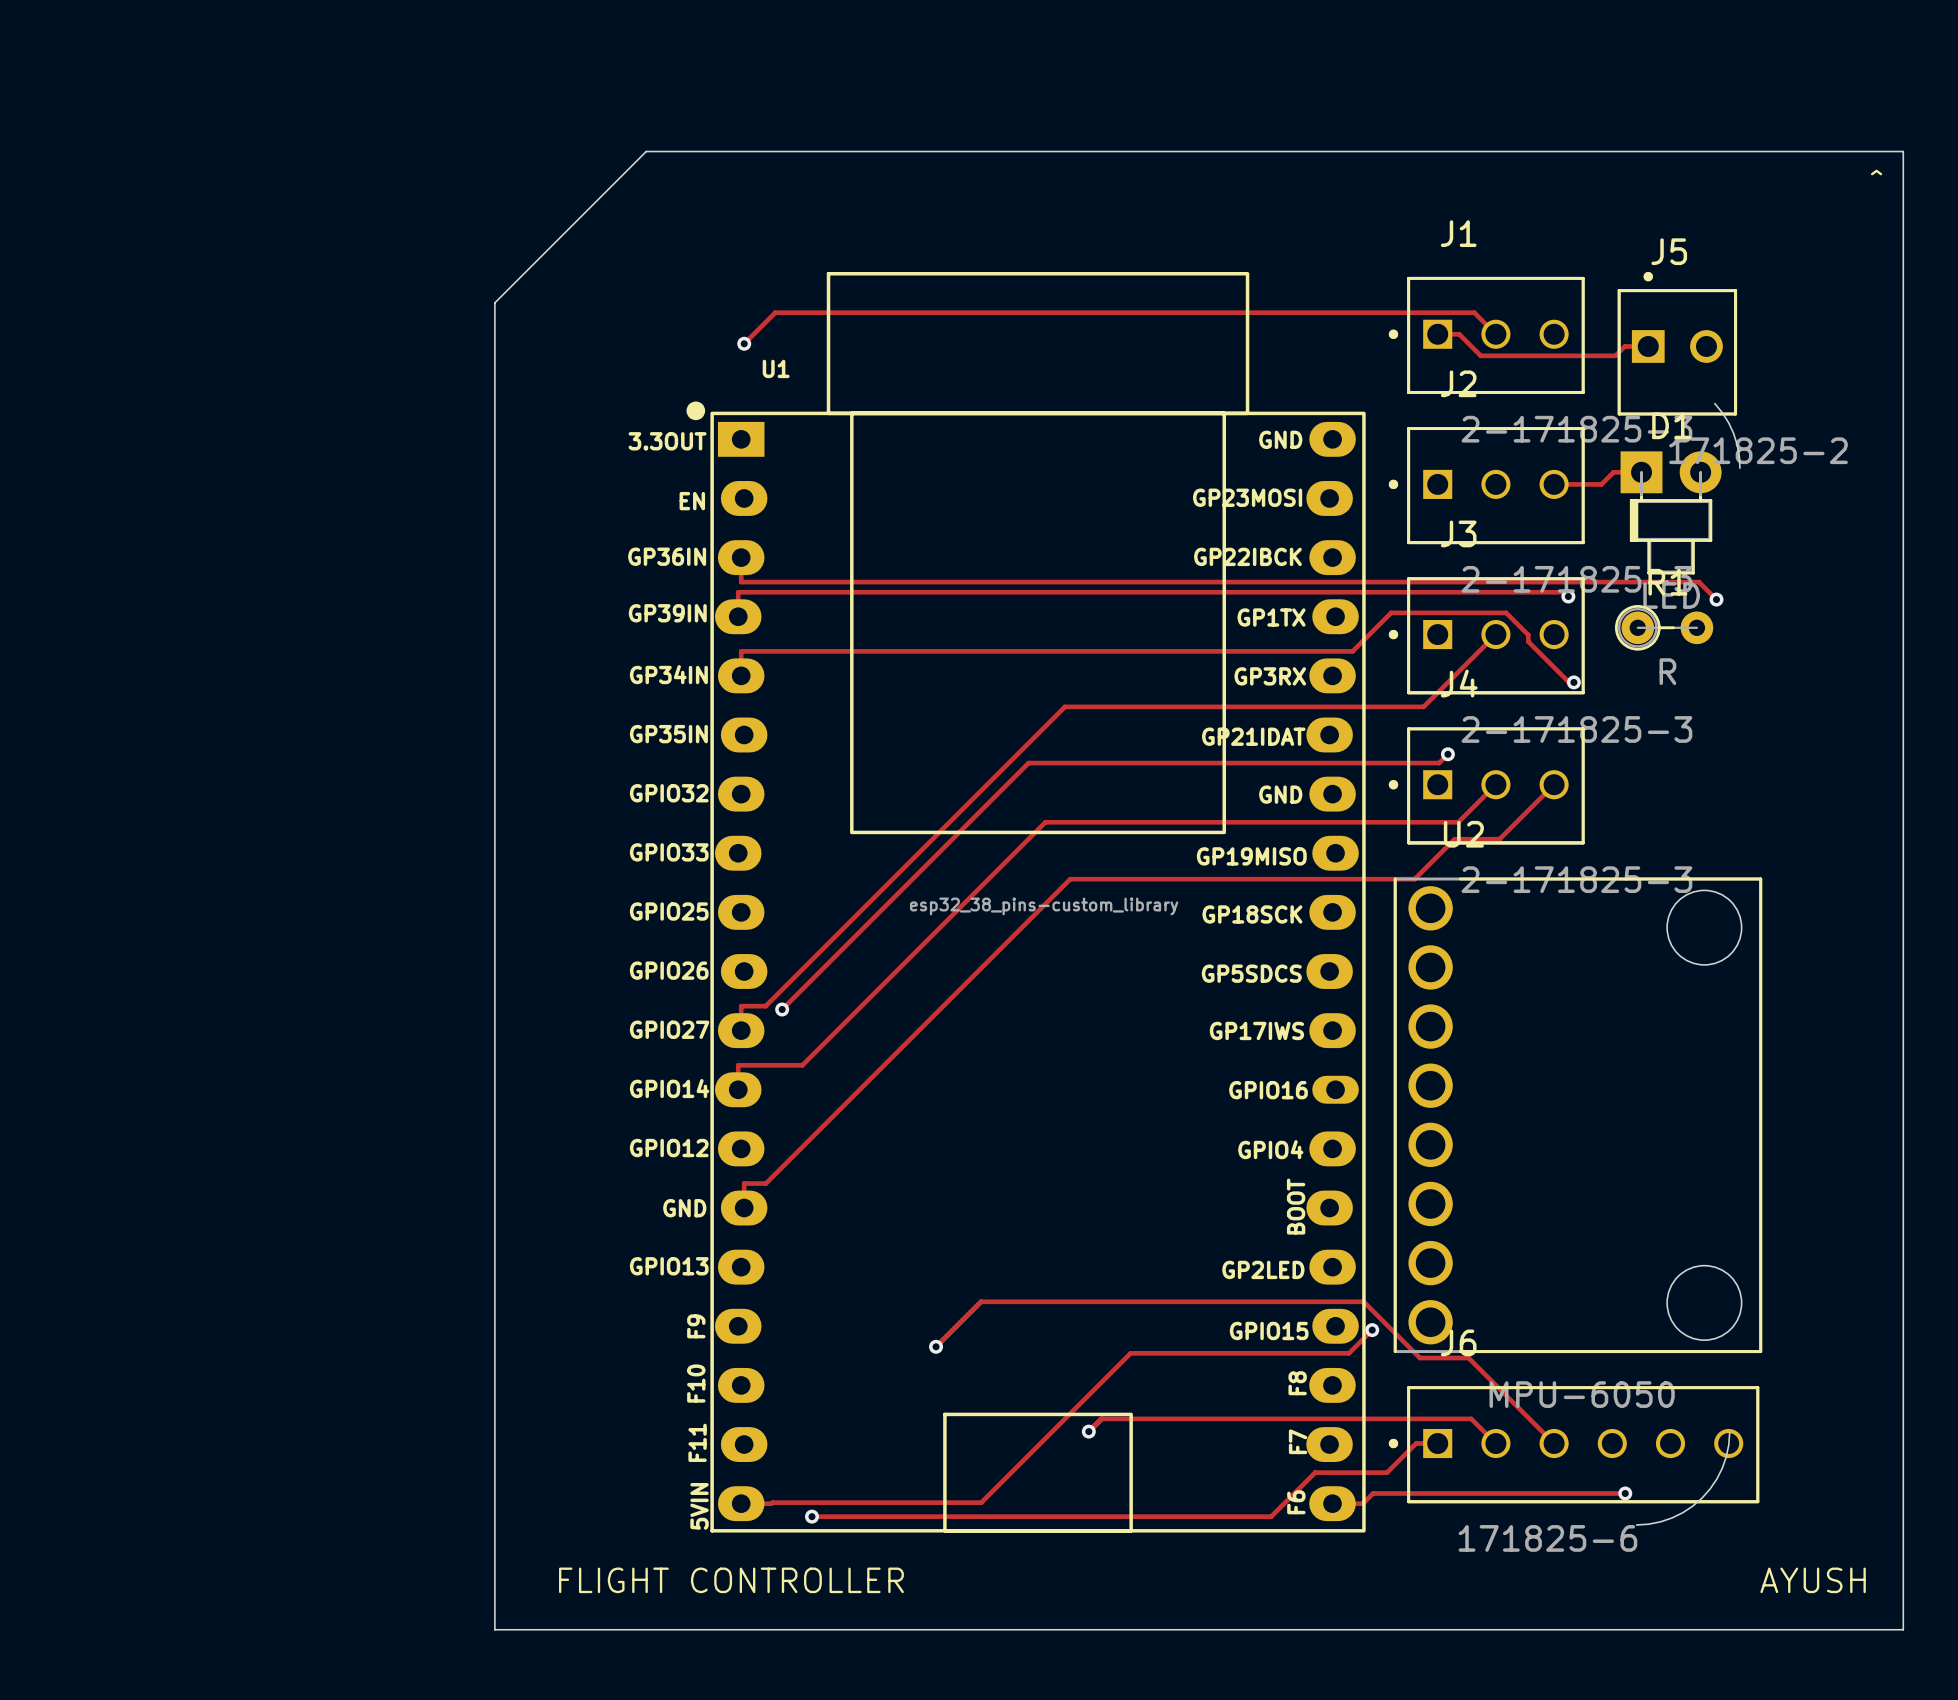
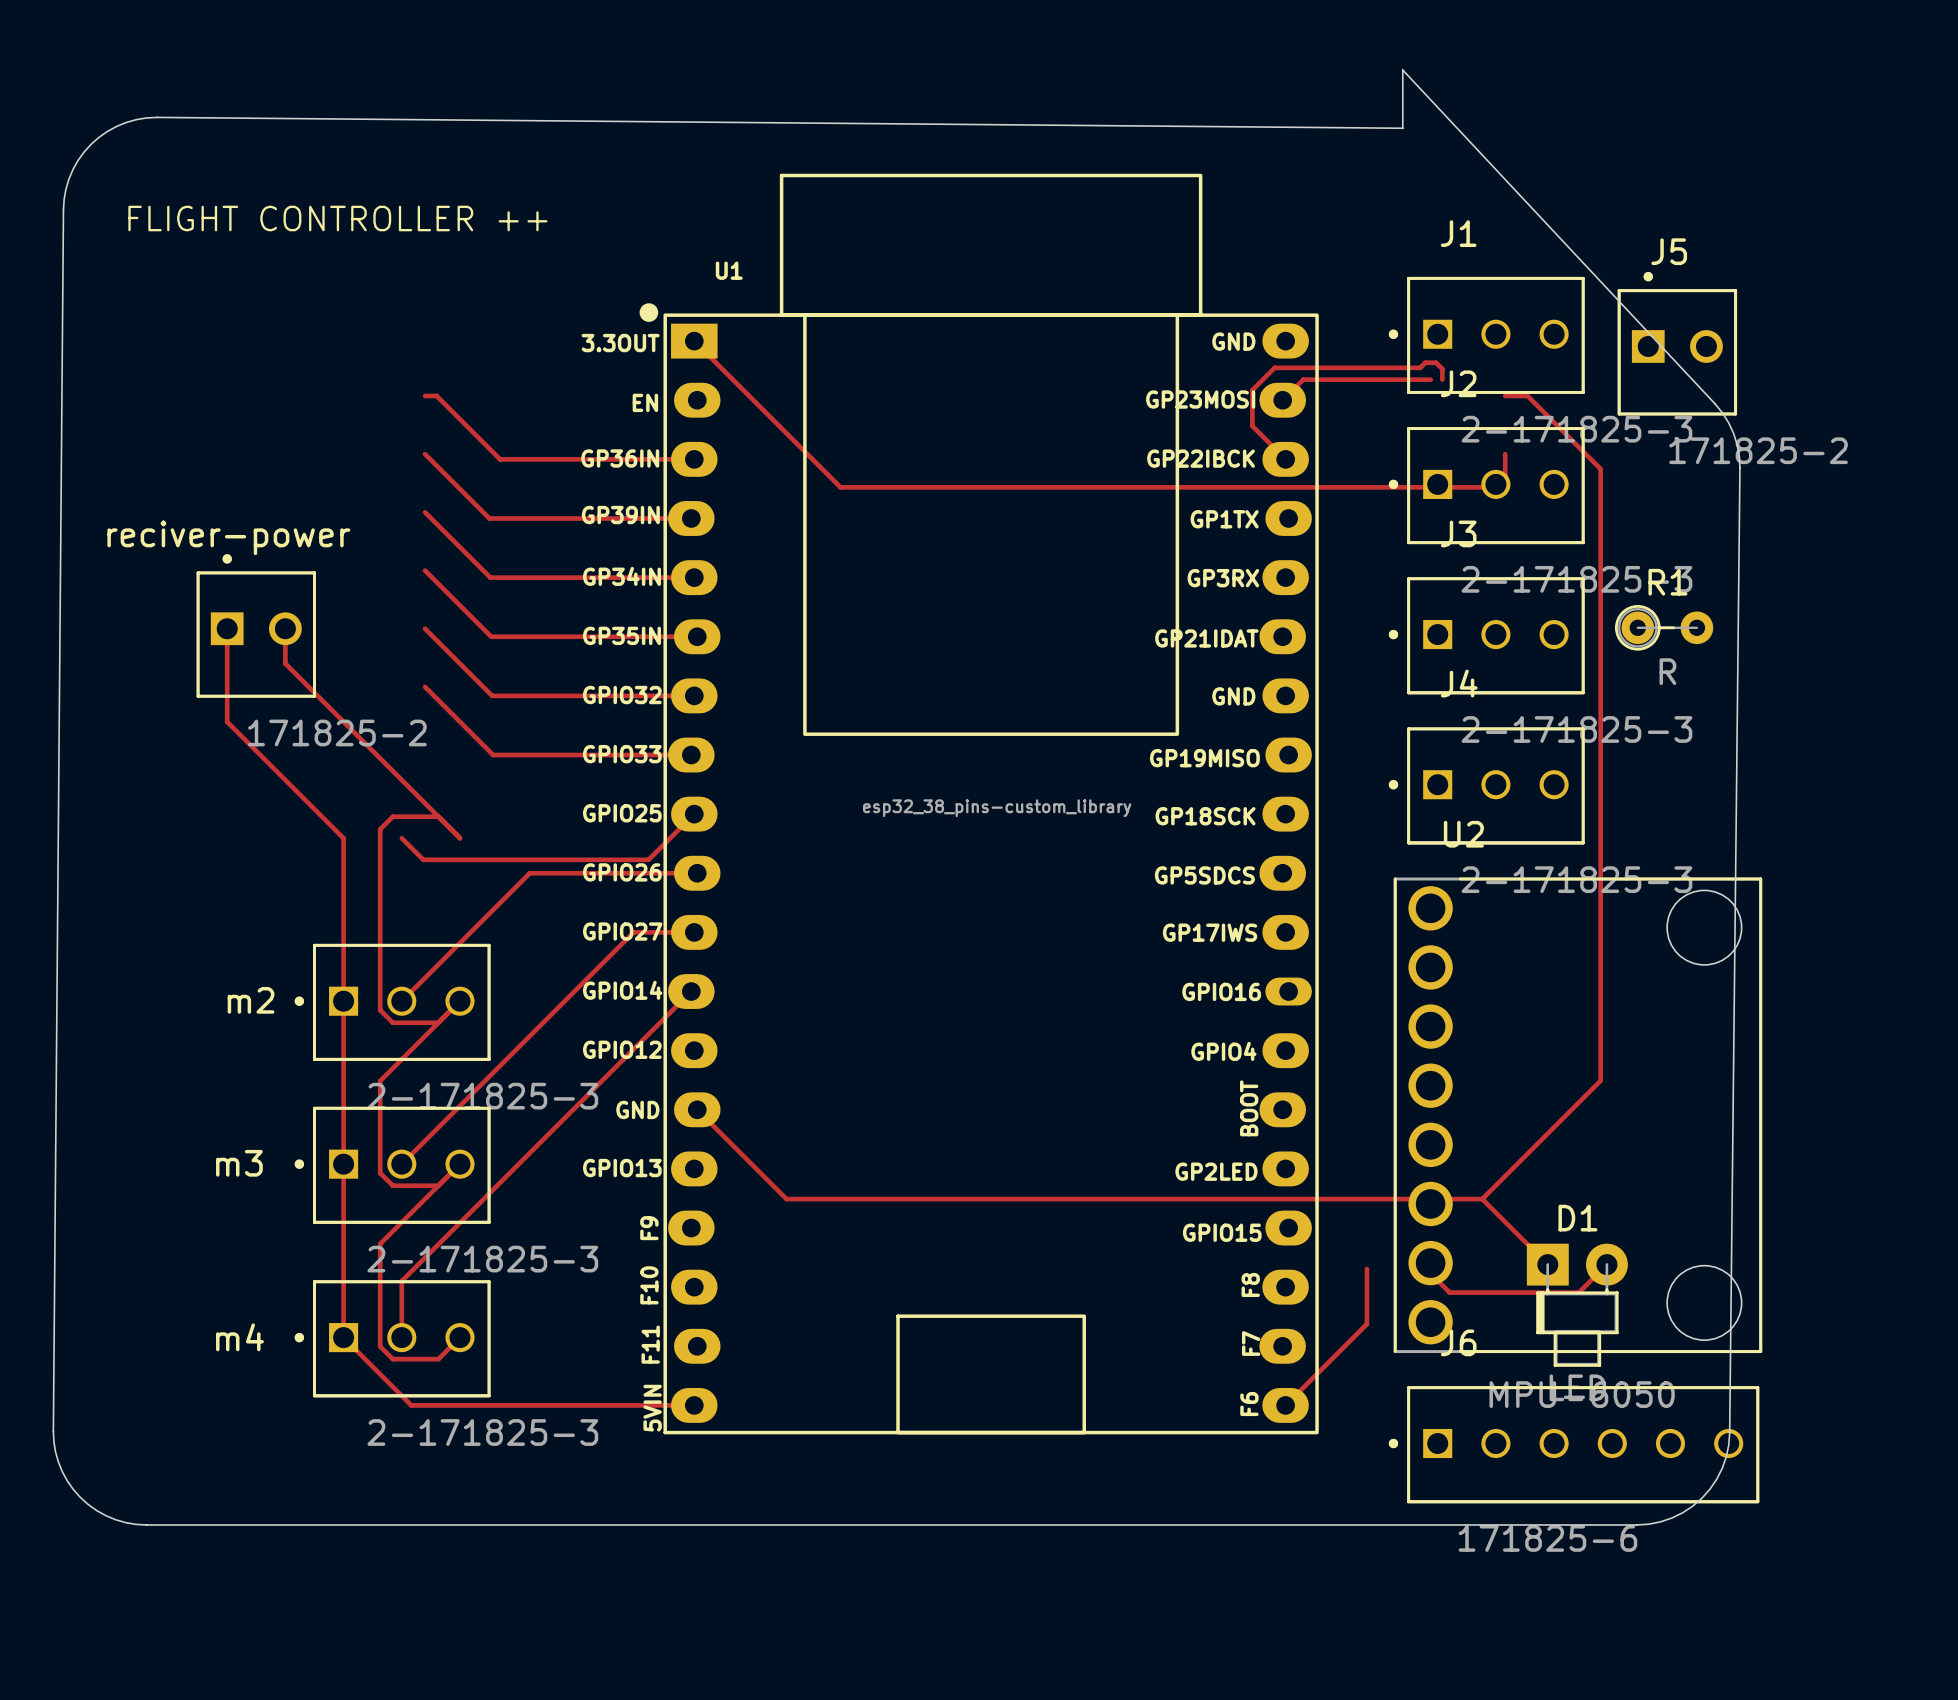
board edge: (646, 151) (494, 302) (494, 1629) (1903, 1629) (1903, 151) (646, 151) -> none
text: ^ (1876, 172) -> none
text: none -> FLIGHT CONTROLLER ++ (337, 218)
track: (1437, 334) (1459, 334) (1480, 355) (1615, 355) (1624, 346) (1648, 346) -> none
track: (1495, 334) (1474, 312) (775, 312) (744, 343) -> none
track: none -> (694, 341) (840, 487) (1494, 487) (1505, 476) (1505, 454)
via: (744, 343) -> none
track: none -> (1430, 379) (1303, 379) (1282, 400)
track: none -> (1442, 379) (1442, 368) (1436, 362) (1425, 362) (1420, 367) (1274, 367) (1252, 390) (1252, 426) (1285, 459)
track: none -> (425, 395) (436, 395) (500, 459) (694, 459)
track: none -> (1505, 395) (1527, 395) (1600, 469) (1600, 1080) (1482, 1199)
board edge: none -> (1714, 403) (1402, 70) (1402, 128) (146, 117) (116, 126) (91, 144) (73, 169) (64, 199) (53, 1431) (55, 1451) (62, 1471) (73, 1489) (88, 1504) (115, 1519) (146, 1524) (1636, 1524)
track: none -> (425, 454) (489, 518) (691, 518)
board edge: none -> (1739, 468) (1729, 1432)
track: (1641, 472) (1613, 472) (1601, 484) (1554, 484) -> none
track: none -> (425, 512) (490, 577) (694, 577)
D1 position: (1671, 512) -> (1577, 1305)
track: (741, 557) (741, 582) (1699, 582) (1716, 599) -> none
track: none -> (425, 570) (491, 636) (697, 636)
track: (1568, 596) (1564, 592) (738, 592) (738, 616) -> none
via: (1568, 596) -> none
via: (1716, 599) -> none
reciver-power: none -> 171825-2 (256, 625)
track: none -> (227, 628) (227, 721) (343, 838) (343, 1337) (411, 1405) (694, 1405)
track: none -> (285, 628) (285, 663) (459, 838)
track: none -> (425, 628) (492, 695) (694, 695)
track: (1495, 634) (1423, 706) (1064, 706) (765, 1006) (741, 1006) (741, 1030) -> none
track: (741, 675) (741, 651) (1352, 651) (1391, 612) (1506, 612) (1528, 634) (1528, 641) (1569, 682) (1573, 682) -> none
via: (1573, 682) -> none
track: none -> (425, 686) (493, 755) (691, 755)
track: (1447, 754) (1439, 763) (1028, 763) (782, 1009) -> none
via: (1447, 754) -> none
track: (1495, 784) (1458, 822) (1045, 822) (802, 1065) (738, 1065) (738, 1089) -> none
track: (1554, 784) (1499, 839) (1454, 839) (1414, 879) (1070, 879) (765, 1183) (744, 1183) (744, 1208) -> none
track: none -> (694, 814) (648, 859) (423, 859) (401, 838)
track: none -> (438, 816) (392, 816) (380, 829) (380, 1010) (392, 1022) (438, 1022)
track: none -> (697, 873) (529, 873) (401, 1001)
U1 position: (1026, 902) -> (979, 804)
track: none -> (694, 932) (633, 932) (401, 1164)
track: none -> (691, 991) (401, 1281) (401, 1337)
track: none -> (459, 1001) (380, 1080) (380, 1173) (392, 1185) (438, 1185)
m2: none -> 2-171825-3 (392, 1002)
via: (782, 1009) -> none
track: none -> (697, 1109) (786, 1199) (1482, 1199)
track: none -> (459, 1164) (380, 1243) (380, 1346) (392, 1359) (438, 1359) (459, 1337)
m3: none -> 2-171825-3 (392, 1165)
track: none -> (1482, 1199) (1547, 1264)
track: none -> (1606, 1264) (1578, 1292) (1449, 1292) (1426, 1268)
track: none -> (1366, 1268) (1366, 1324) (1285, 1405)
track: (1372, 1330) (1349, 1353) (1130, 1353) (981, 1502) (741, 1503) -> none
via: (1372, 1330) -> none
m4: none -> 2-171825-3 (392, 1338)
track: (936, 1346) (981, 1301) (1363, 1301) (1419, 1357) (1468, 1357) (1554, 1443) -> none
via: (936, 1346) -> none
track: (1088, 1431) (1101, 1418) (1471, 1418) (1495, 1443) -> none
via: (1088, 1431) -> none
track: (1437, 1443) (1416, 1443) (1387, 1472) (1315, 1472) (1271, 1516) (811, 1516) -> none
track: (1625, 1493) (1372, 1493) (1362, 1503) (1332, 1503) -> none
via: (1625, 1493) -> none
via: (811, 1516) -> none
text: FLIGHT CONTROLLER (731, 1580) -> none
text: AYUSH (1813, 1580) -> none

